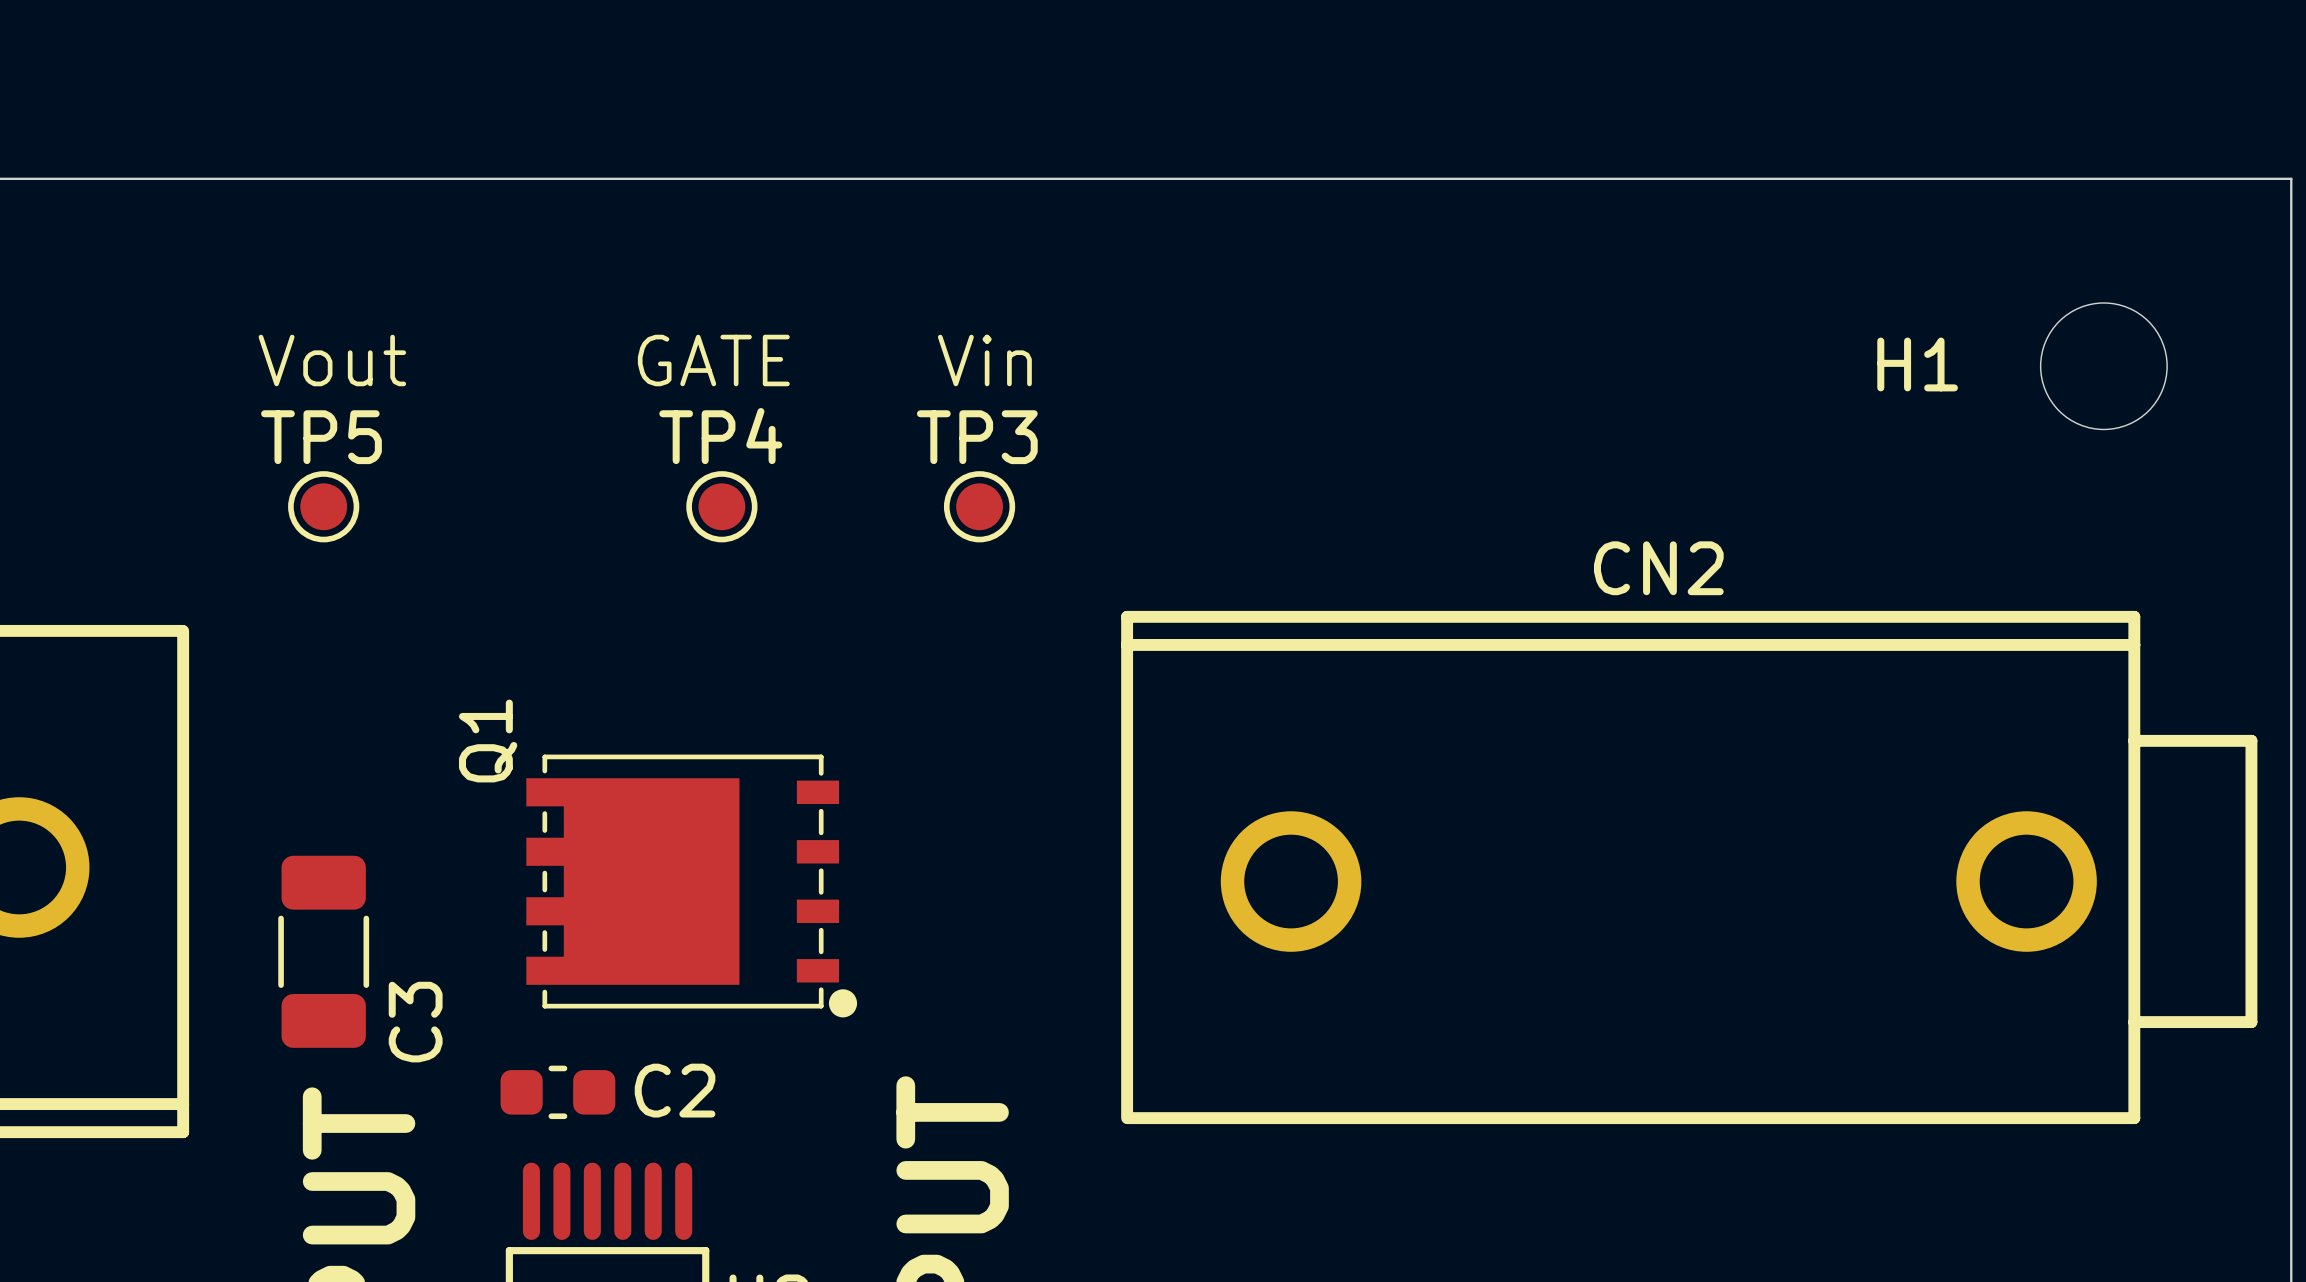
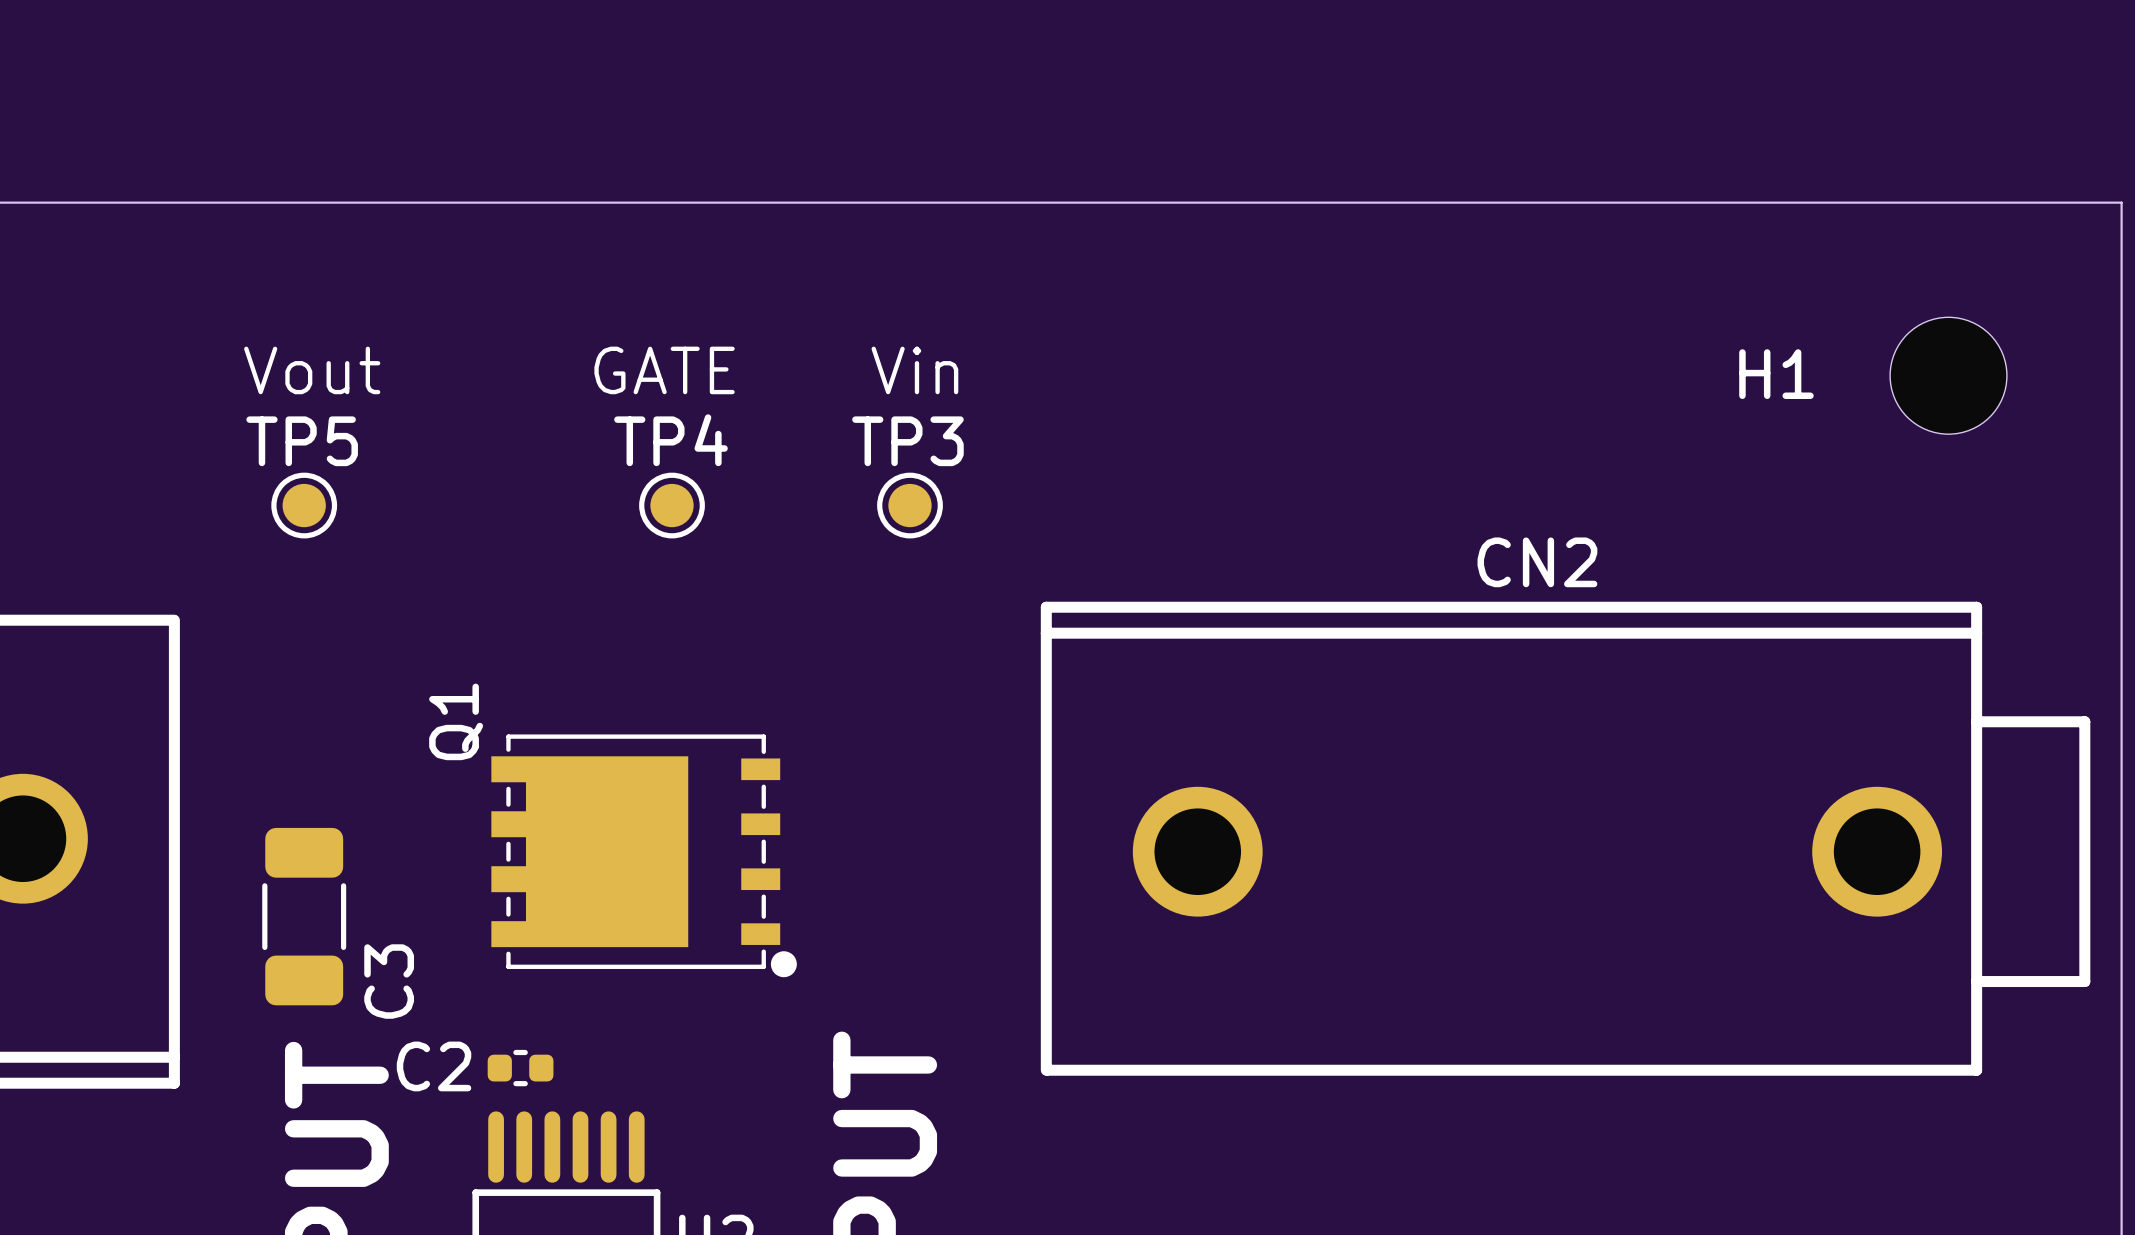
C2 footprint: [500, 1065, 616, 1120] -> [487, 1049, 554, 1087]
C2 name position: C2 (675, 1090) -> C2 (434, 1066)

